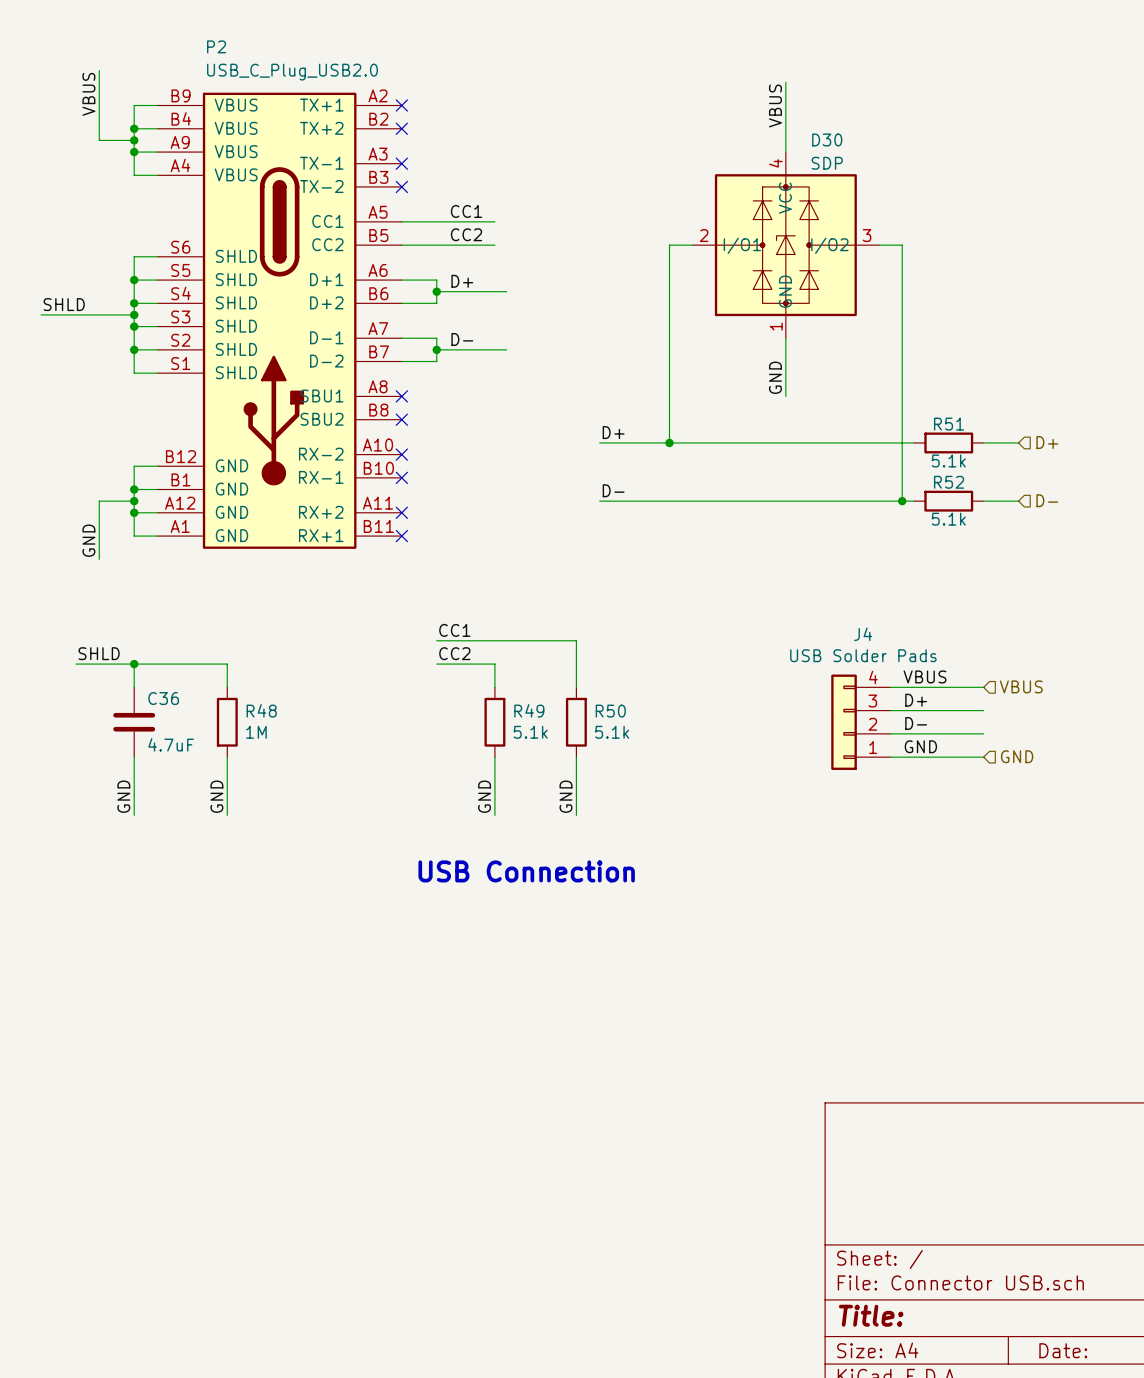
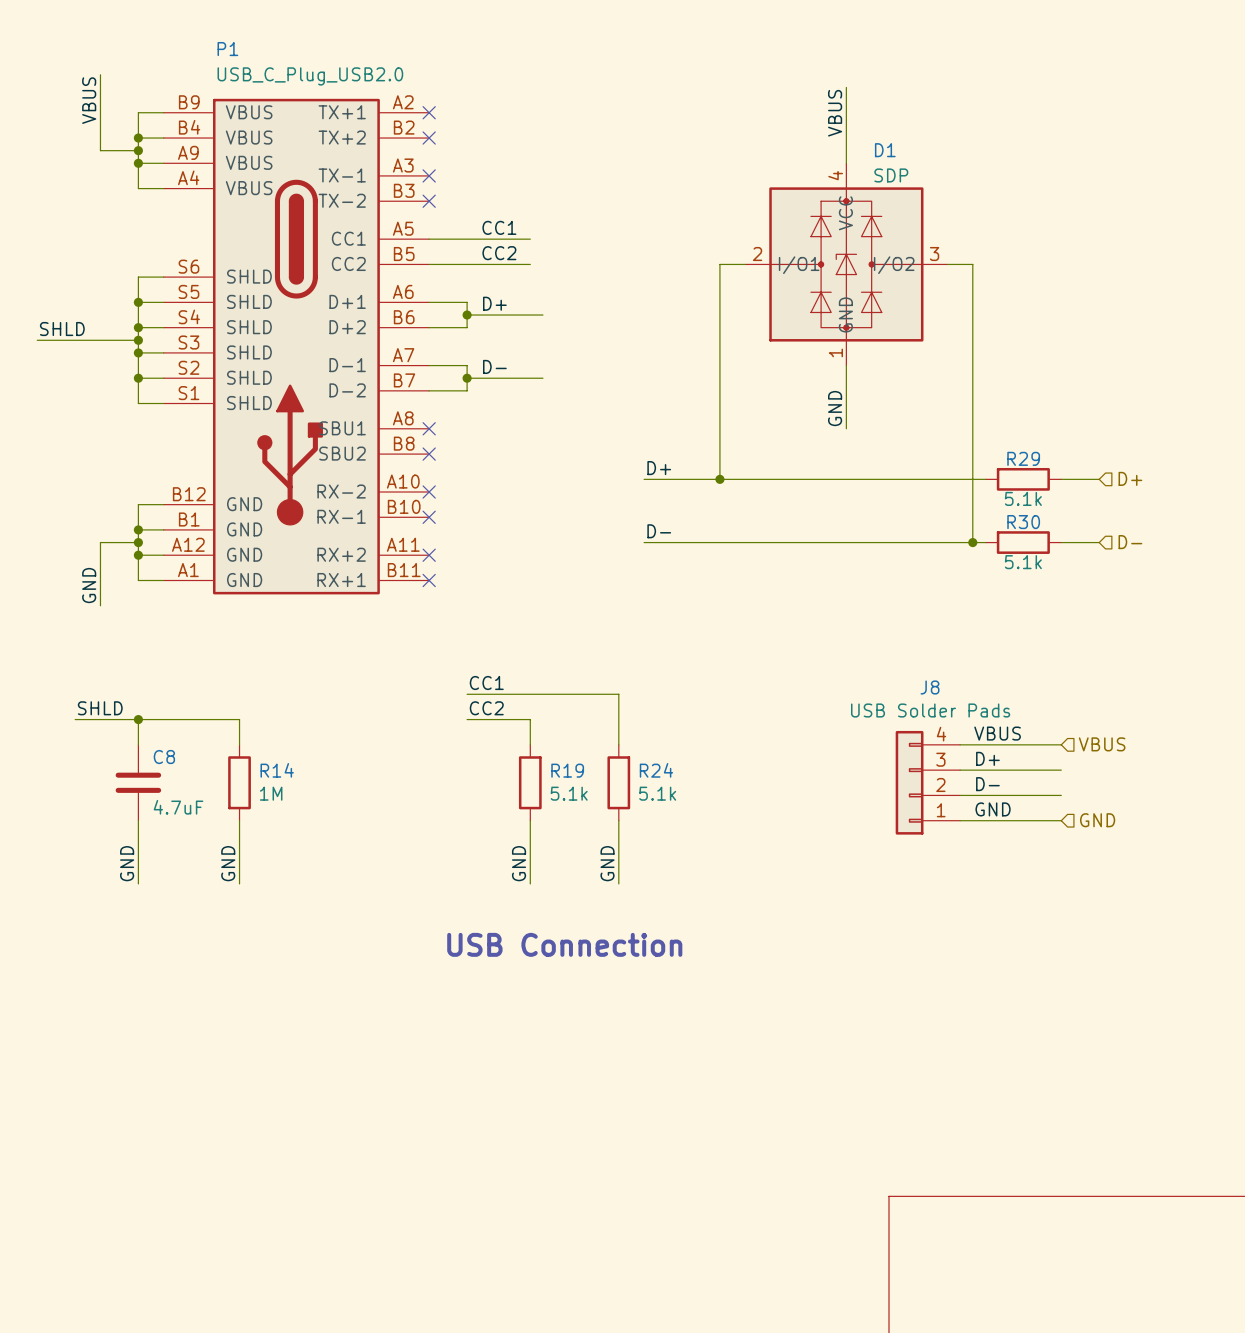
P2 name: P2 (216, 46) -> P1 (227, 49)
D30 name: D30 (827, 139) -> D1 (885, 150)
R51 name: R51 (949, 424) -> R29 (1023, 458)
R52 name: R52 (949, 482) -> R30 (1023, 522)
J4 name: J4 (863, 634) -> J8 (930, 687)
C36 name: C36 (163, 698) -> C8 (164, 757)
R48 name: R48 (261, 710) -> R14 (277, 770)
R49 name: R49 (529, 710) -> R19 (567, 770)
R50 name: R50 (610, 711) -> R24 (656, 770)

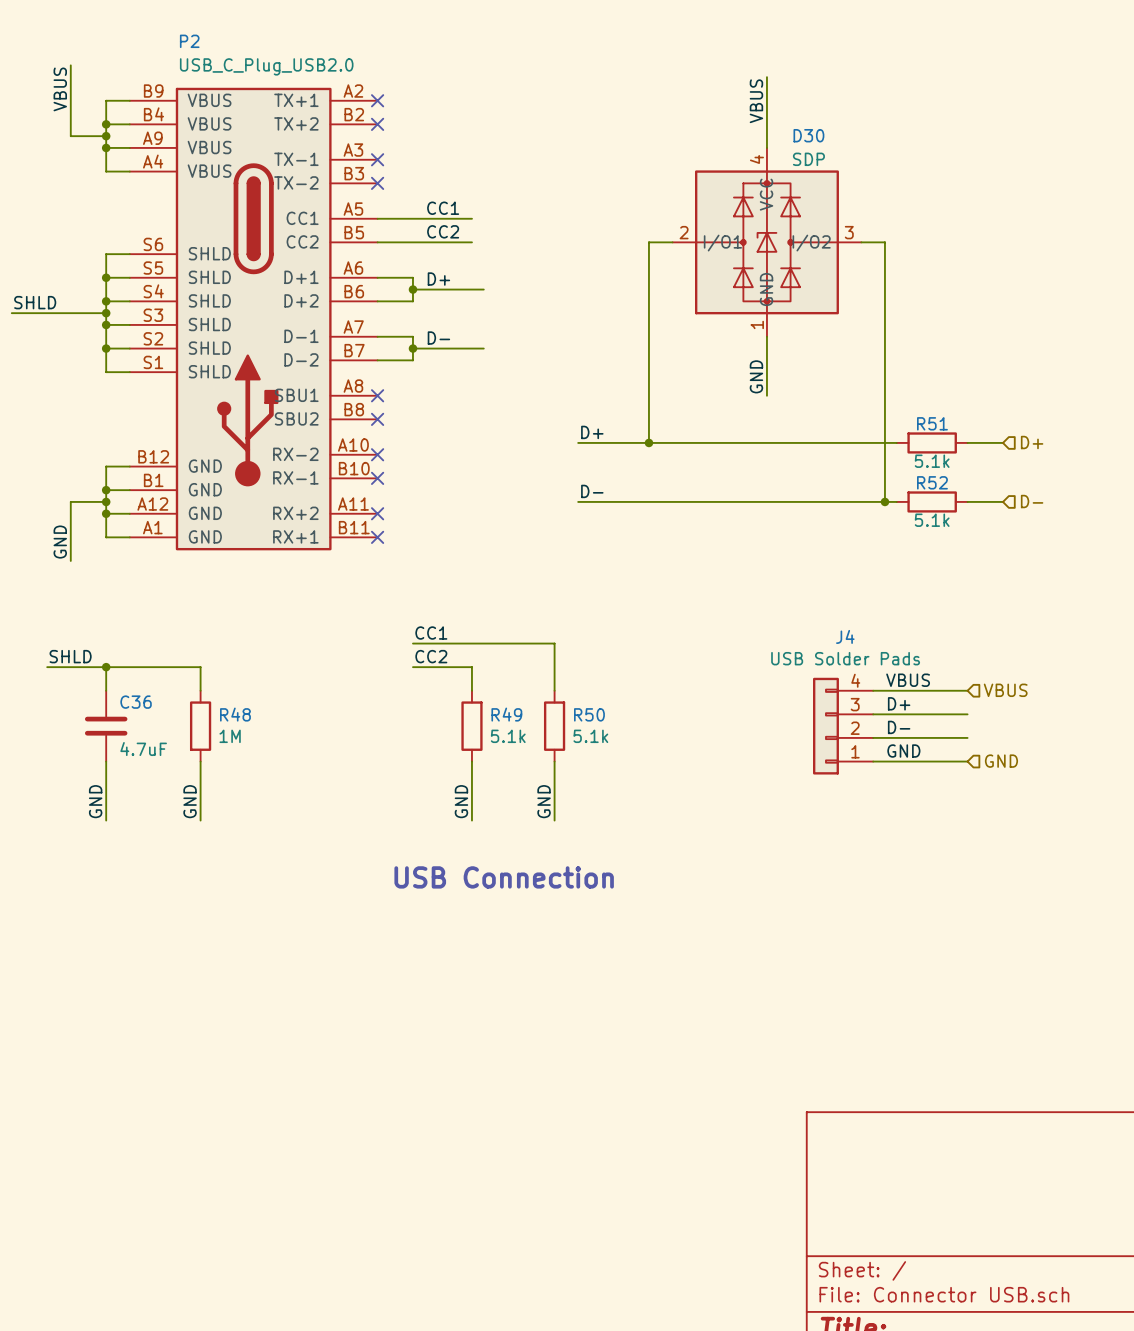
P1 name: P1 (227, 49) -> P2 (189, 41)
D1 name: D1 (885, 150) -> D30 (808, 135)
R29 name: R29 (1023, 458) -> R51 (932, 423)
R30 name: R30 (1023, 522) -> R52 (932, 482)
J8 name: J8 (930, 687) -> J4 (845, 636)
C8 name: C8 (164, 757) -> C36 (136, 702)
R14 name: R14 (277, 770) -> R48 (235, 714)
R19 name: R19 (567, 770) -> R49 (506, 714)
R24 name: R24 (656, 770) -> R50 (589, 714)

